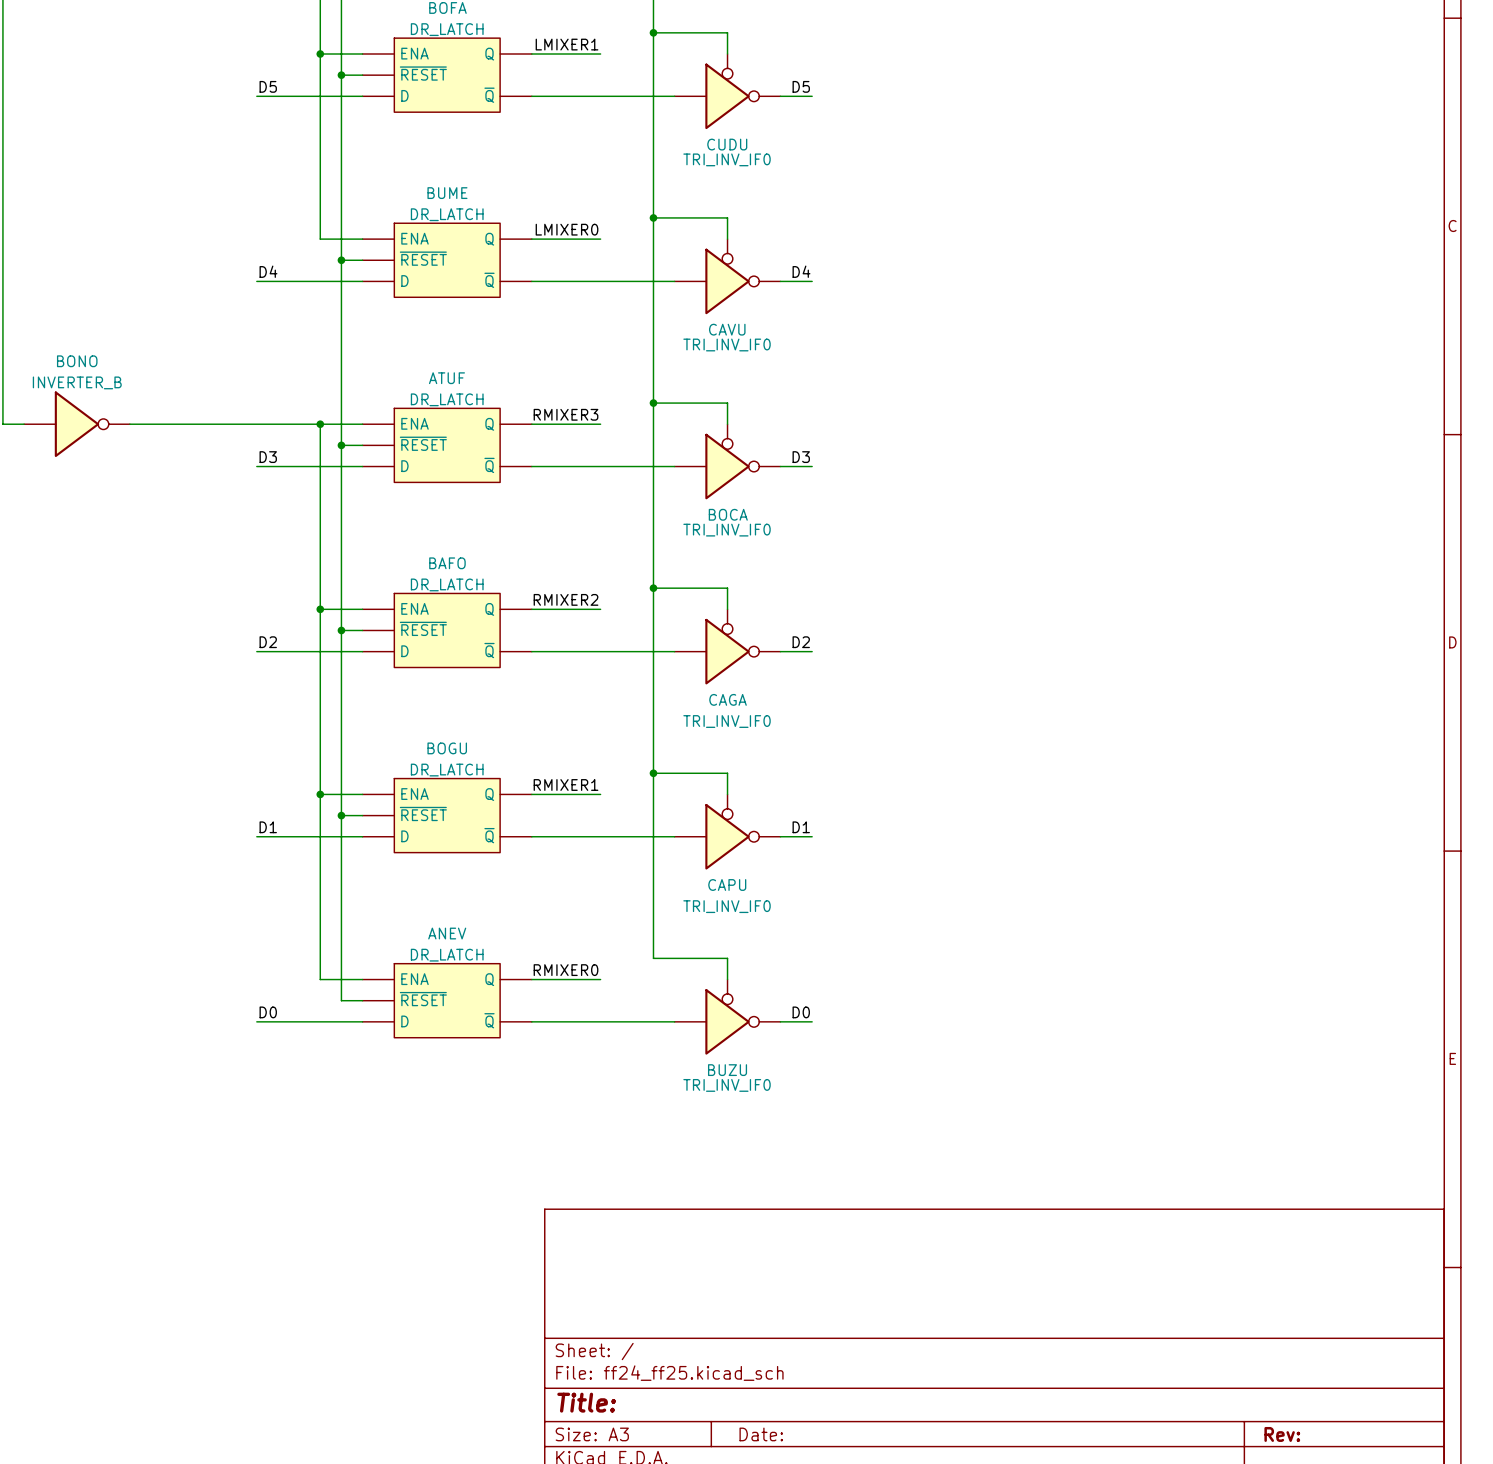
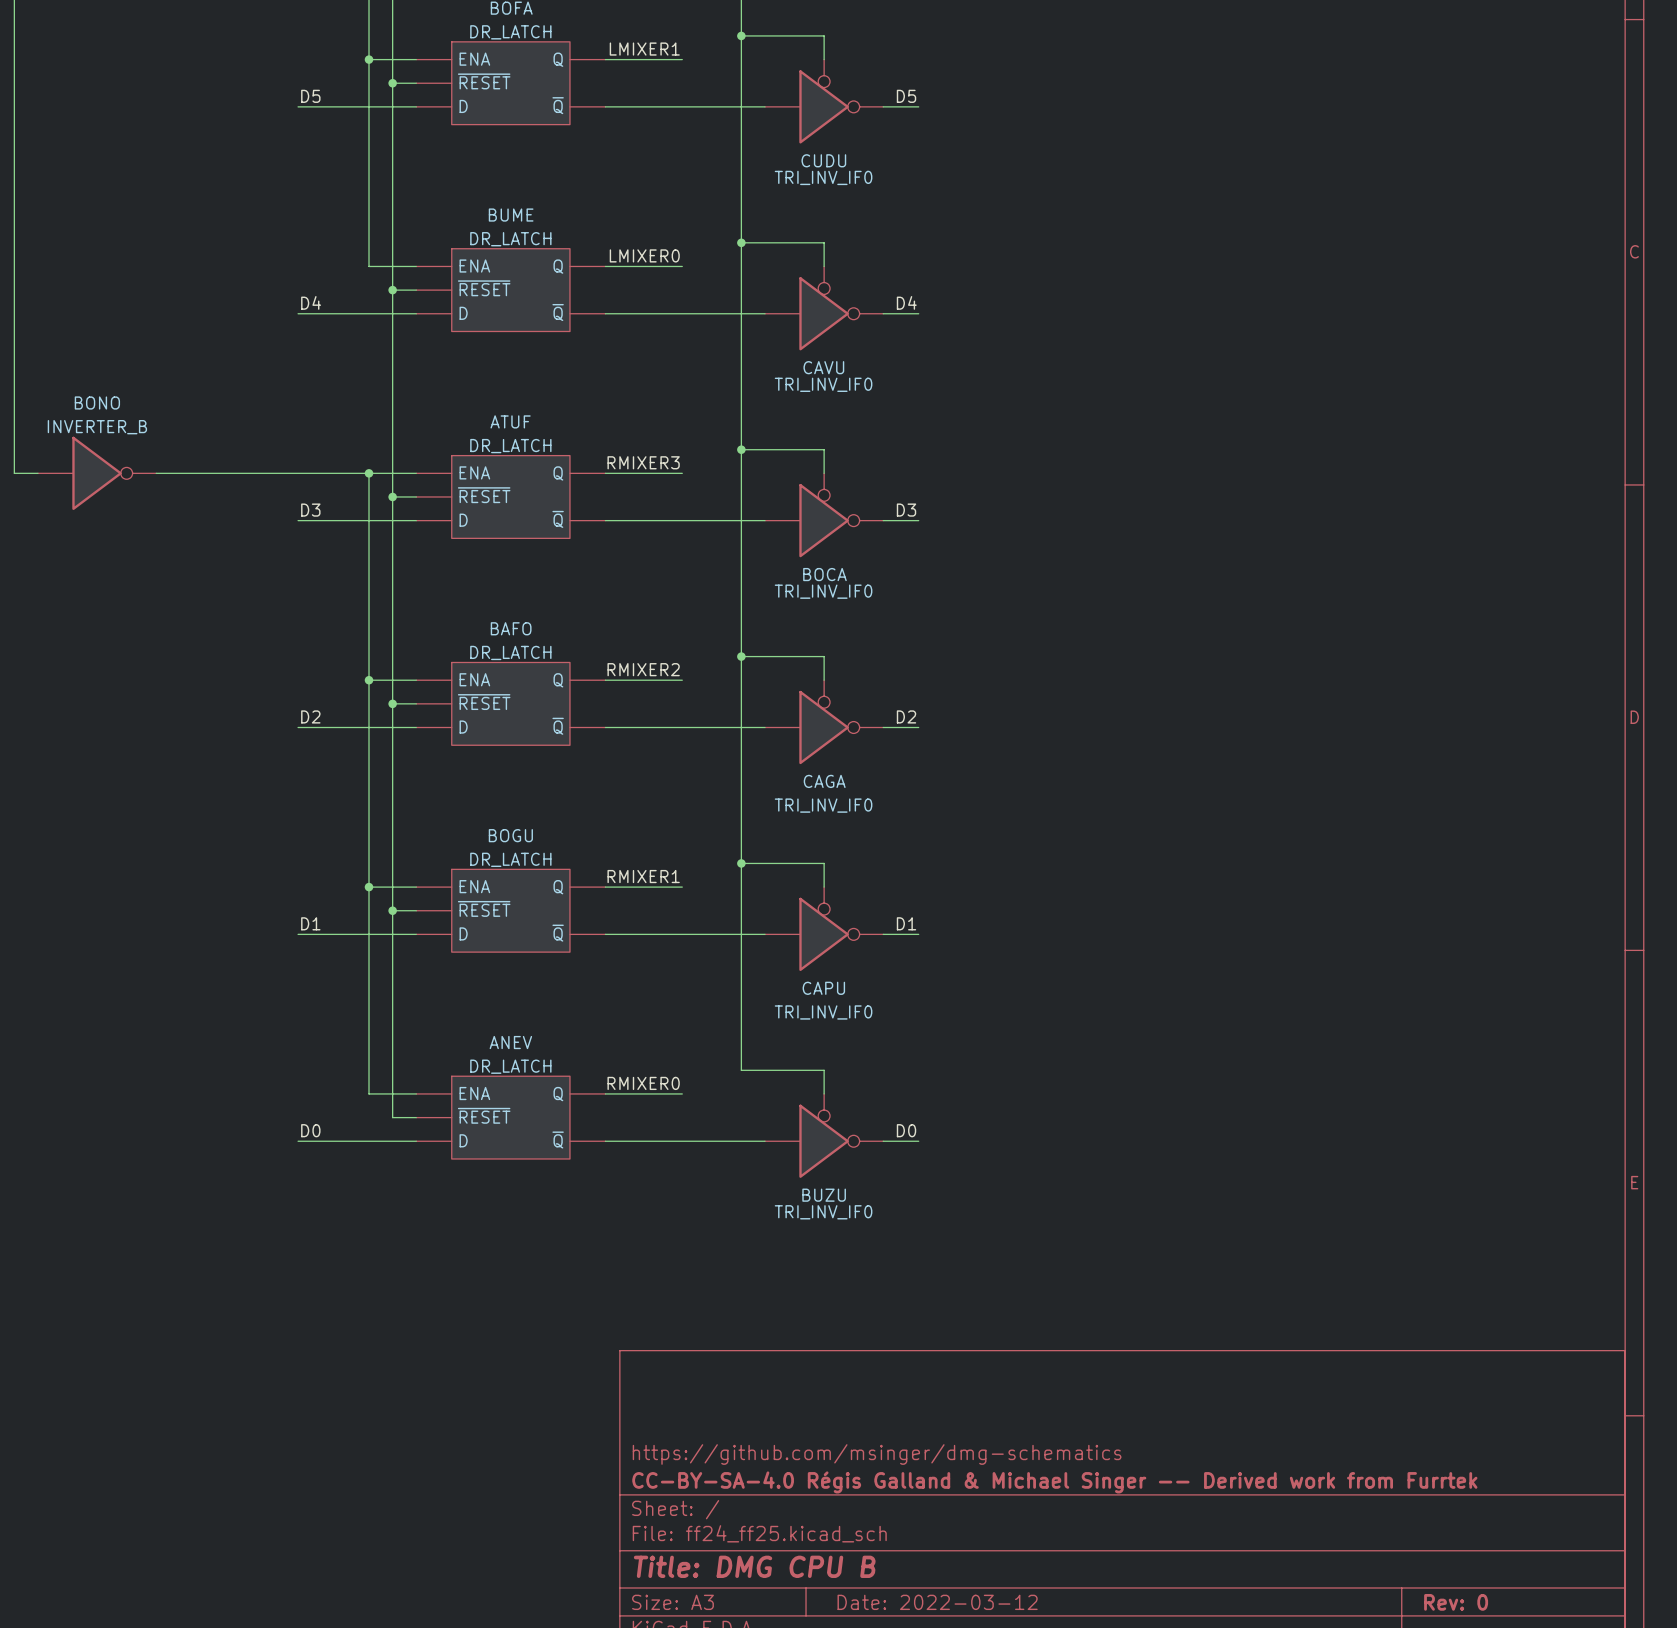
title block: none -> https://github.com/msinger/dmg-schematics (877, 1454)
title block: none -> CC-BY-SA-4.0 Régis Galland & Michael Singer -- Derived work from Furrtek (1054, 1482)
title block: Title: (586, 1402) -> Title: DMG CPU B (754, 1566)
title block: Date: (761, 1434) -> Date: 2022-03-12 (937, 1602)
title block: Rev: (1282, 1434) -> Rev: 0 (1456, 1602)

